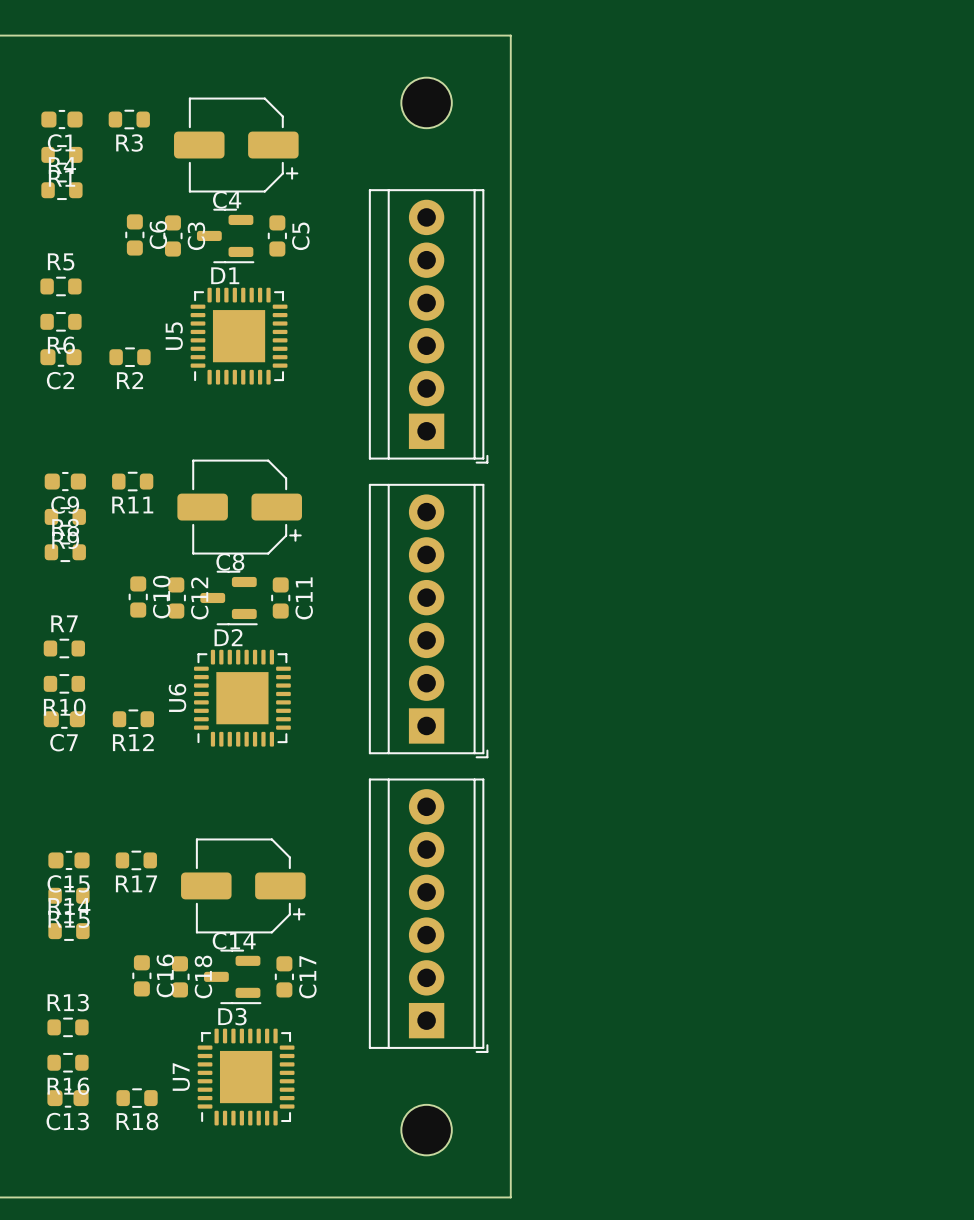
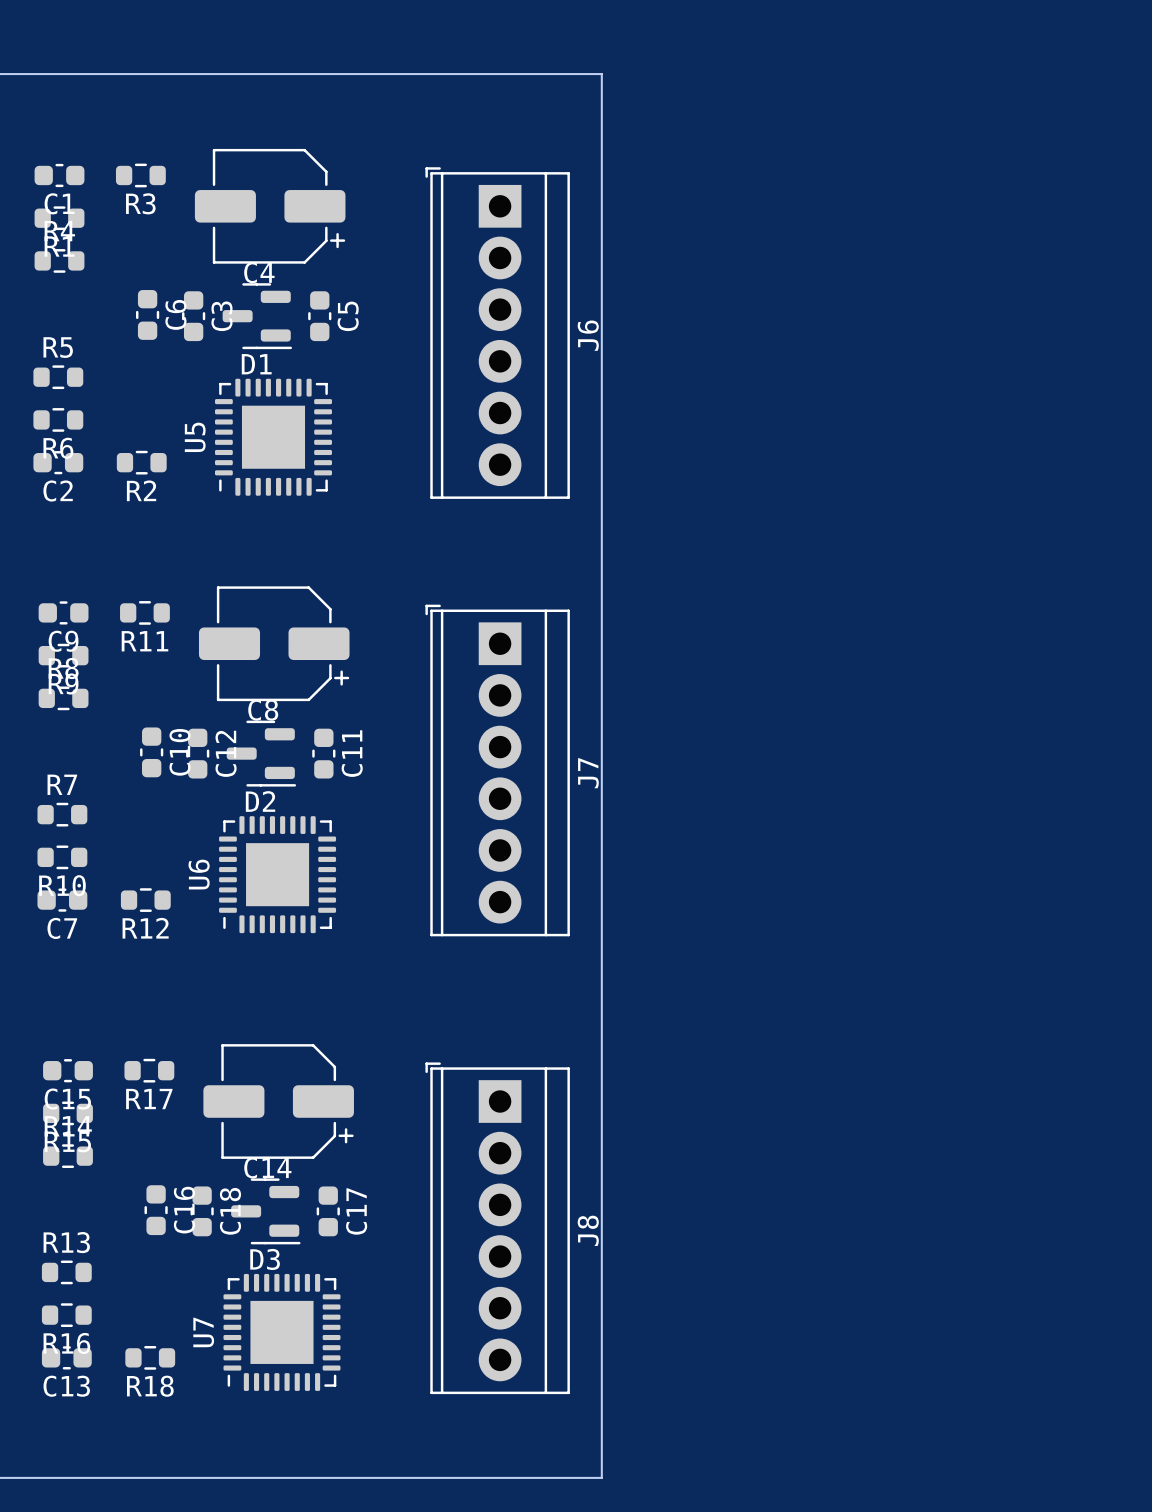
part: (426, 102) -> none
J6: none -> (497, 333)
part: (428, 326) -> none
J7: none -> (497, 770)
part: (428, 621) -> none
part: (428, 915) -> none
J8: none -> (497, 1228)
part: (426, 1130) -> none

